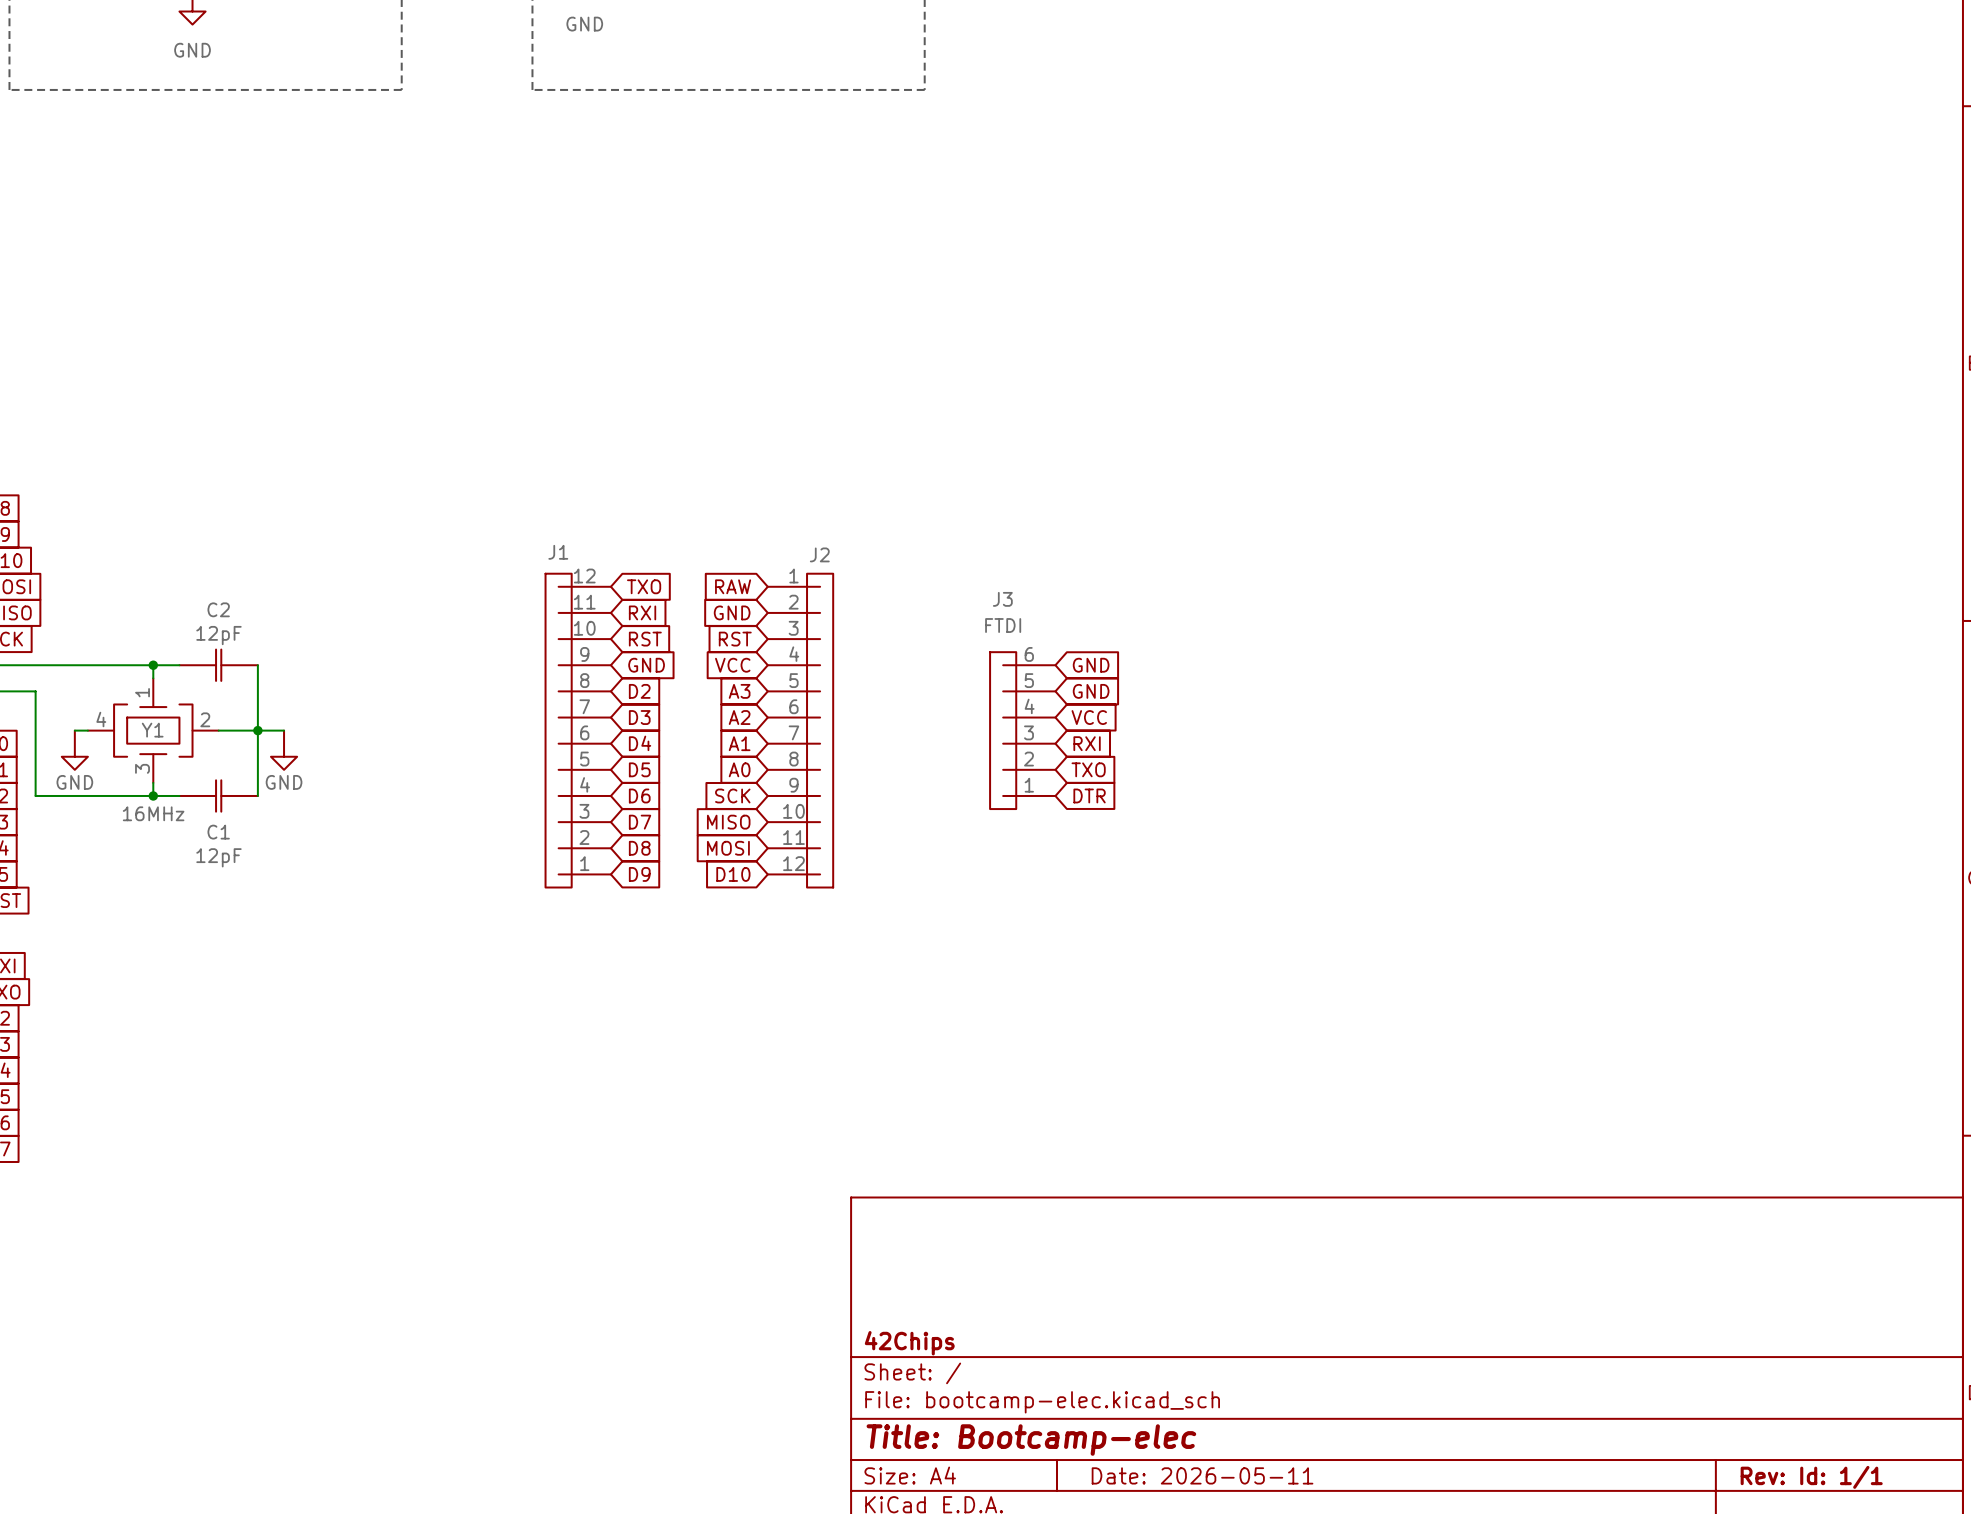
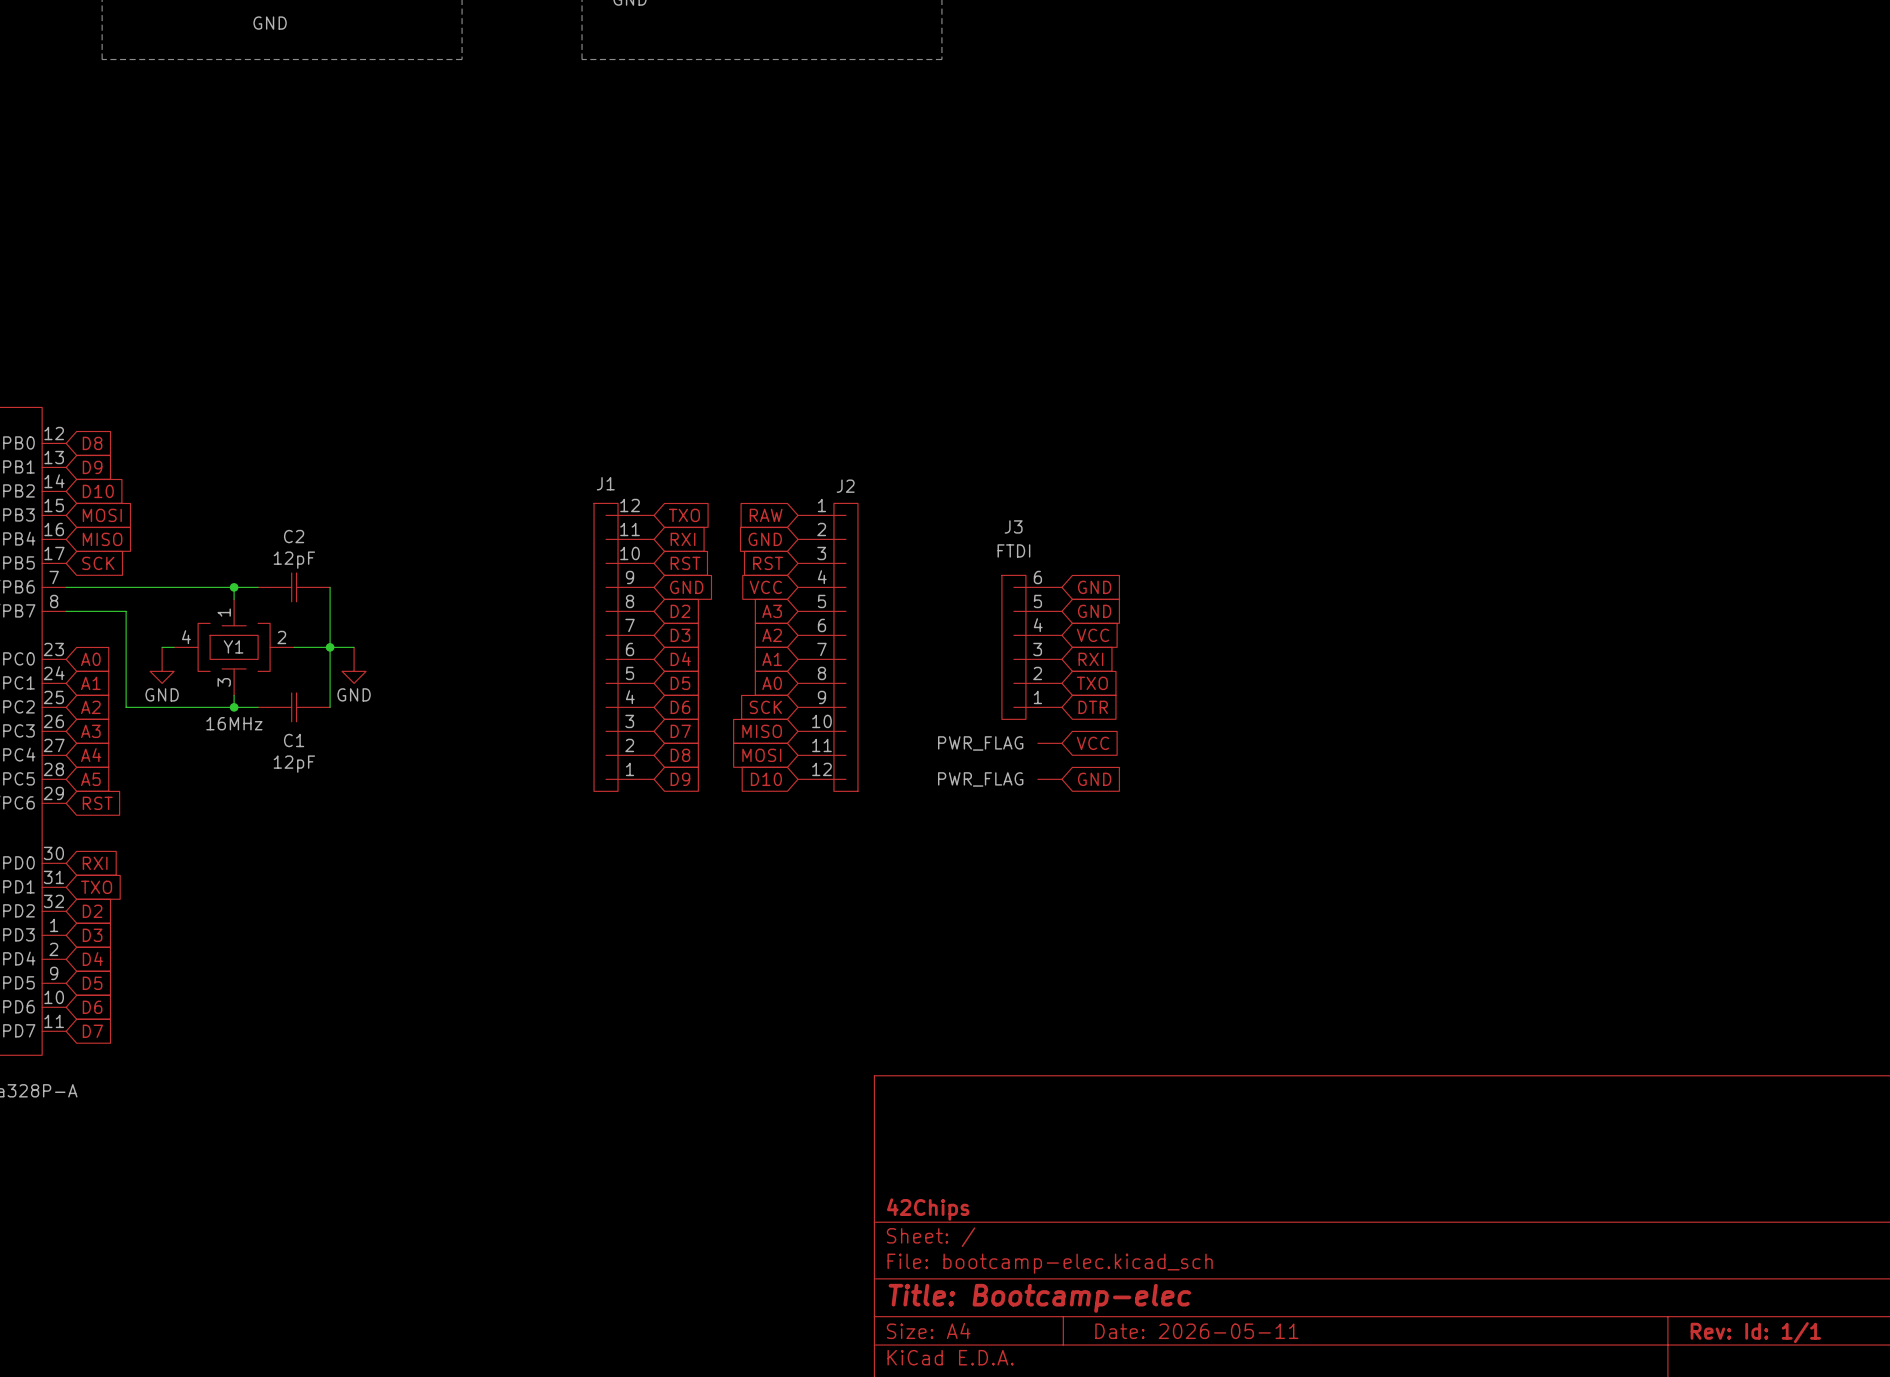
power symbol: none -> PWR_FLAG (1049, 743)
global label: none -> VCC (1092, 743)
power symbol: none -> PWR_FLAG (1049, 779)
global label: none -> GND (1094, 779)

